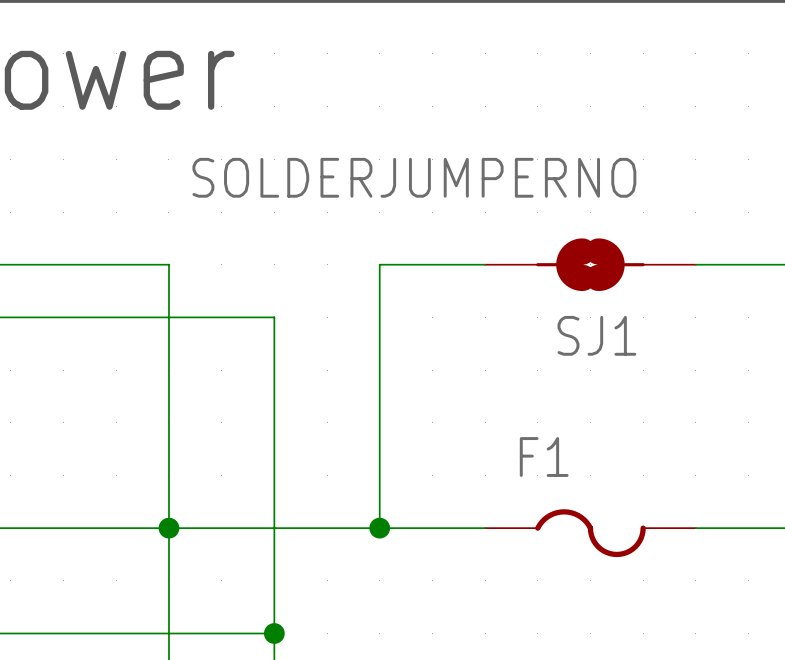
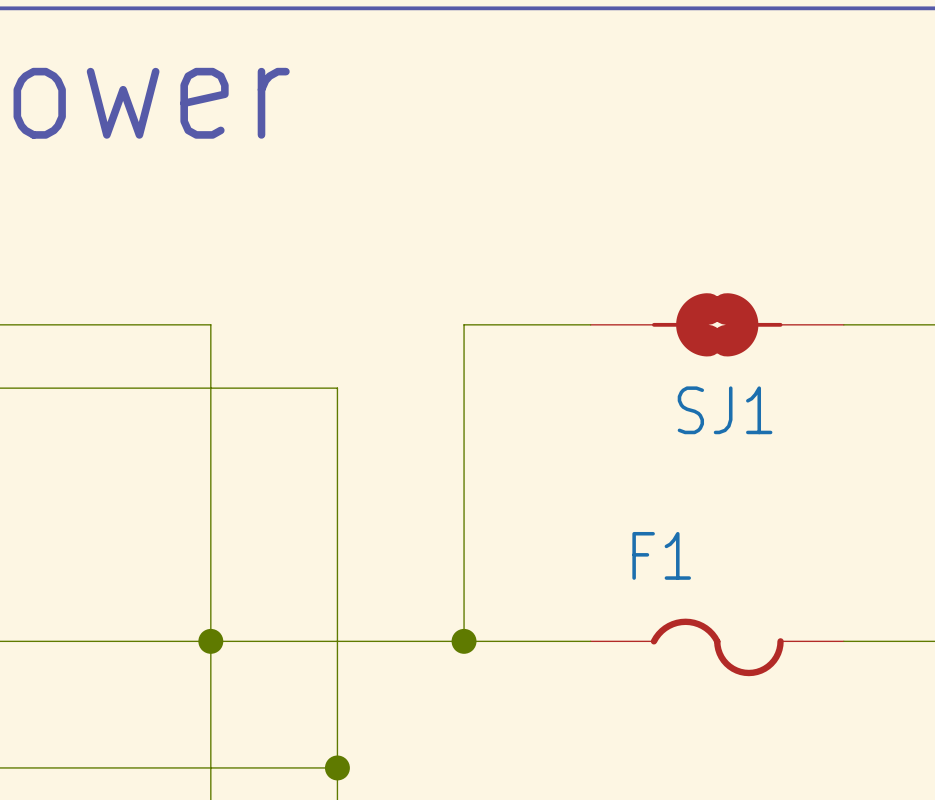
SJ1 value: SOLDERJUMPERNO (414, 177) -> none

